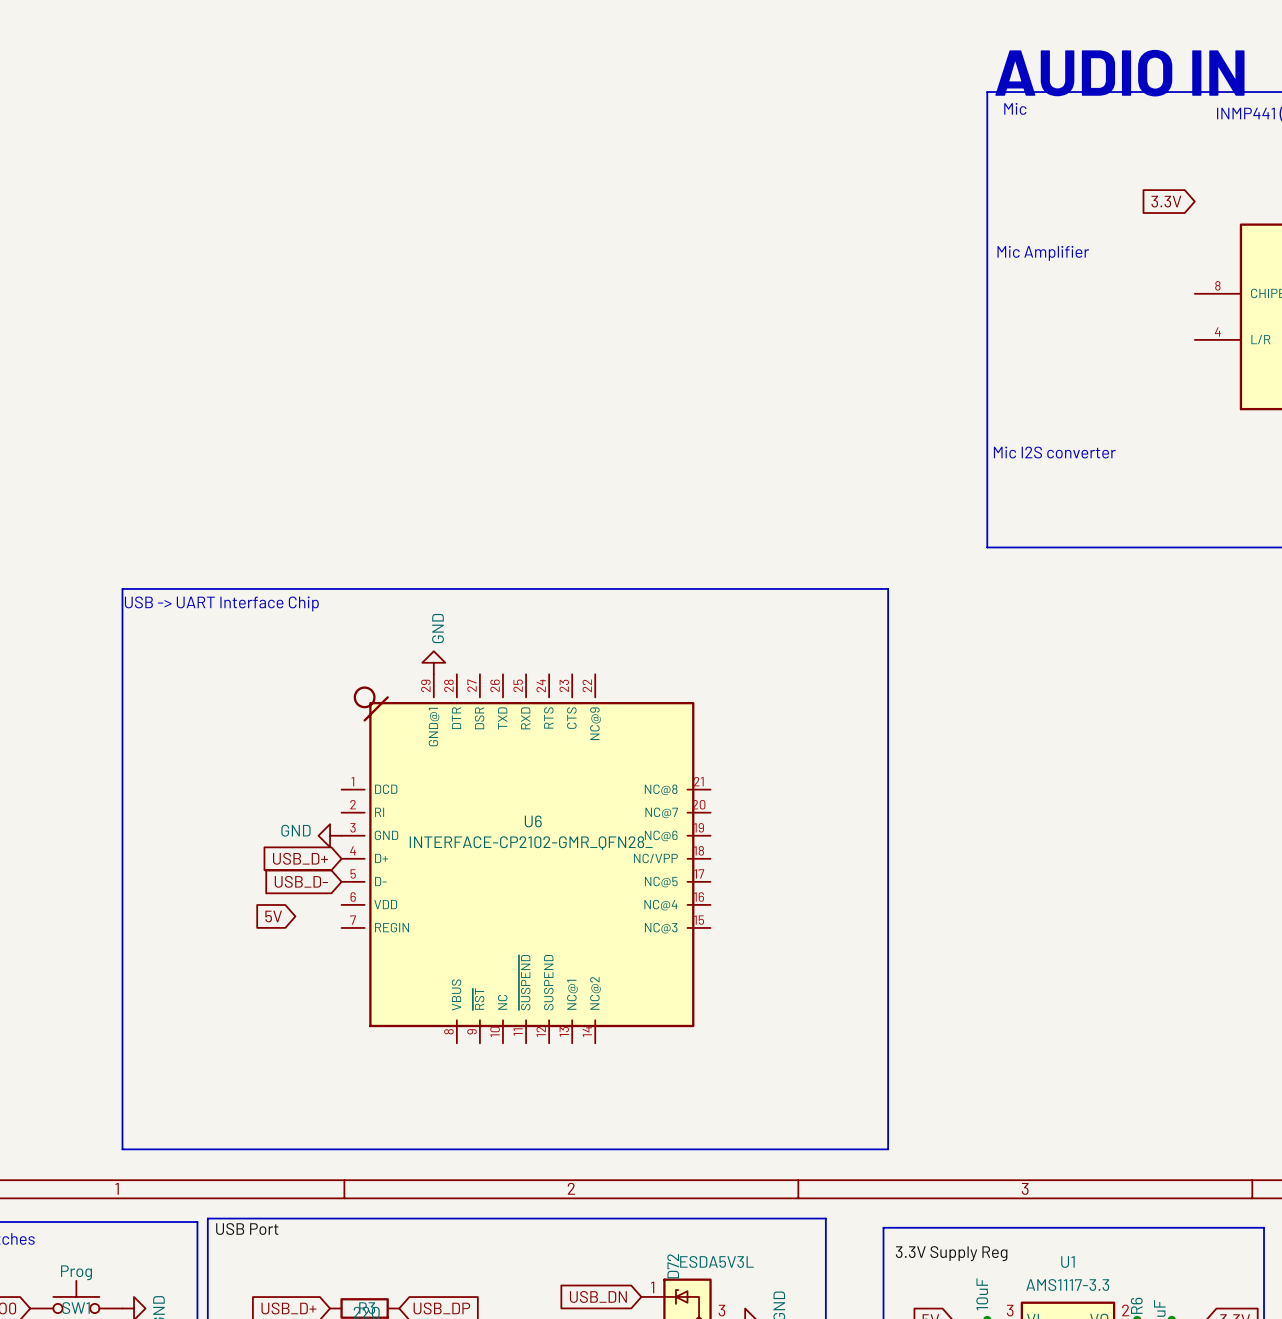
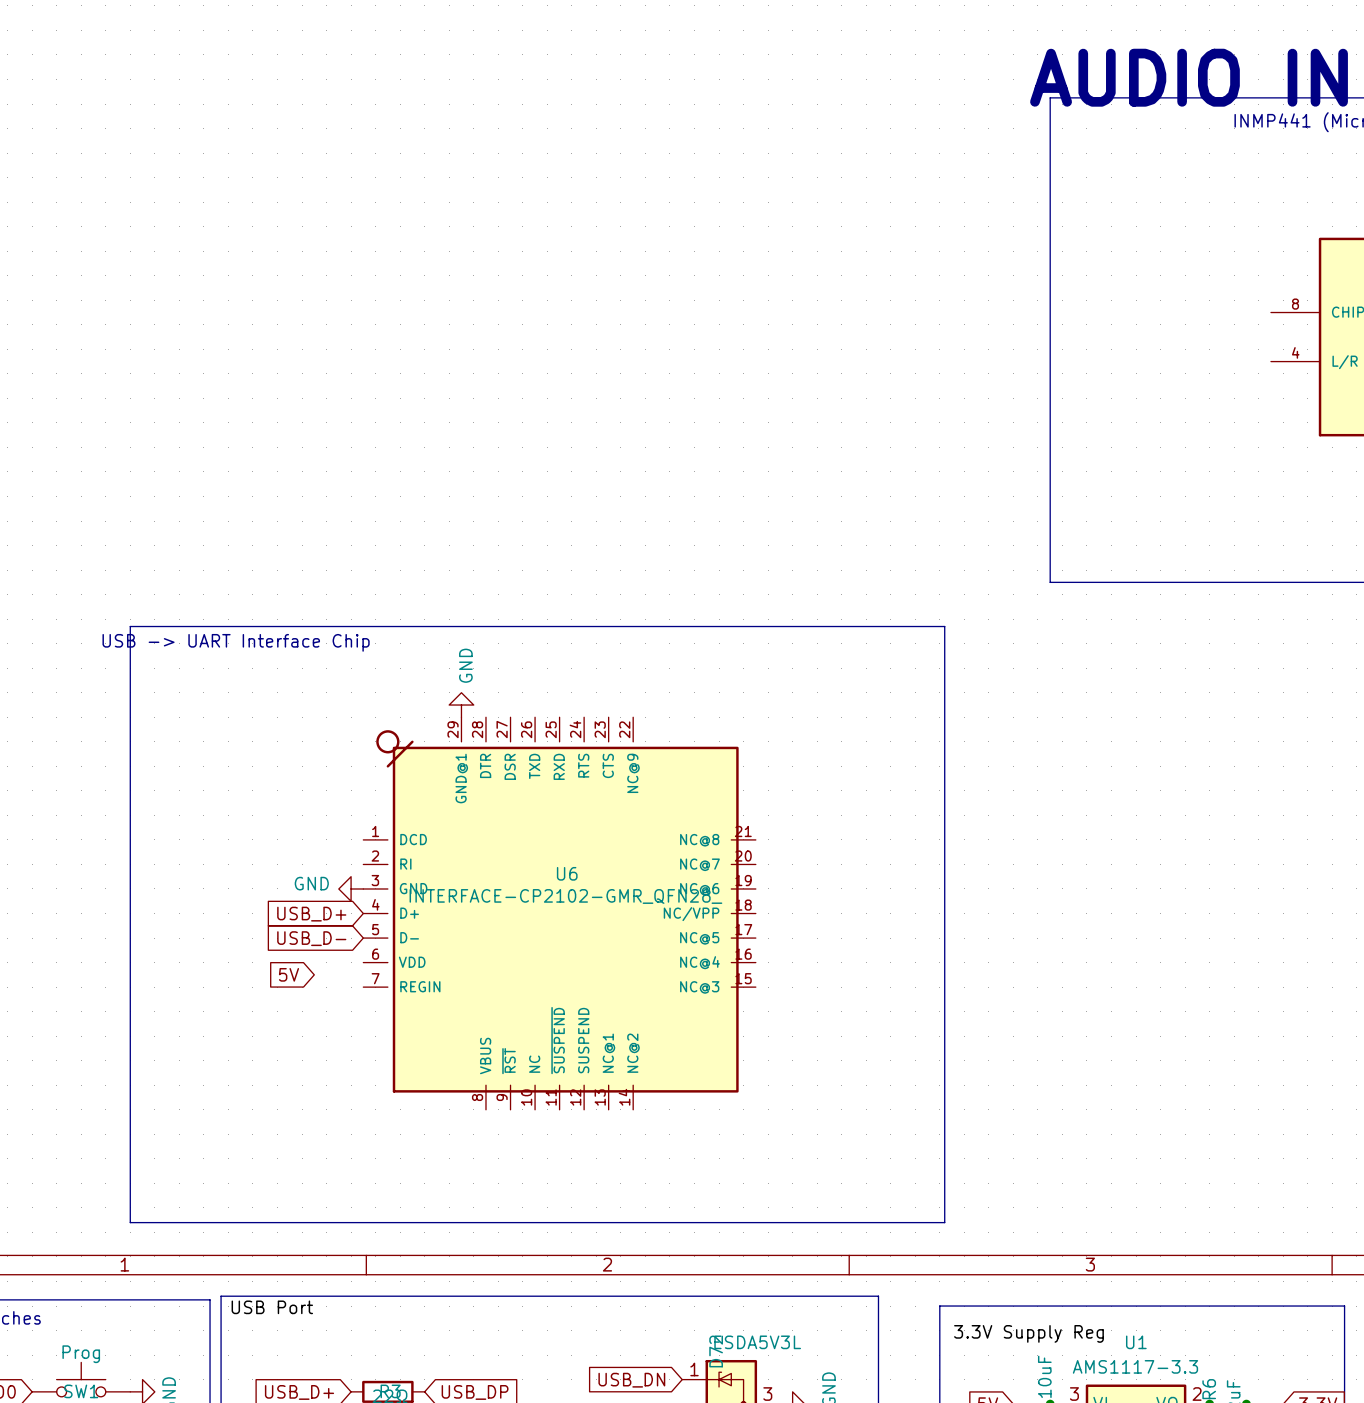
text: Mic (1015, 108) -> none
global label: 3.3V (1166, 201) -> none
text: Mic Amplifier (1043, 253) -> none
text: Mic I2S converter (1054, 452) -> none

